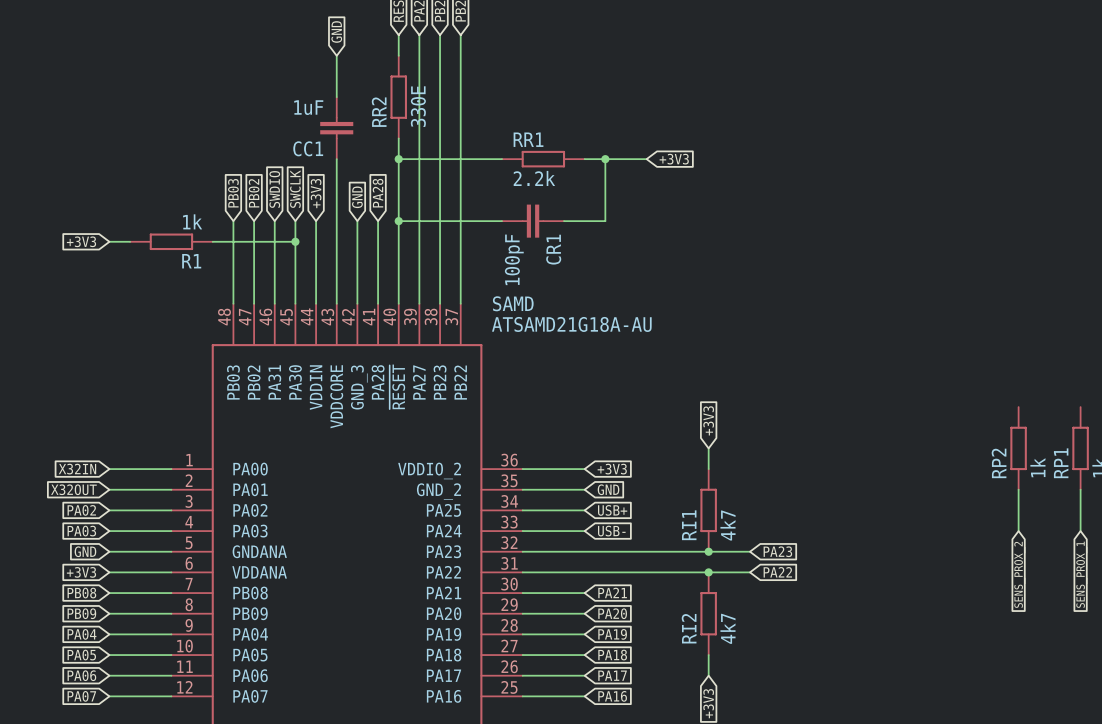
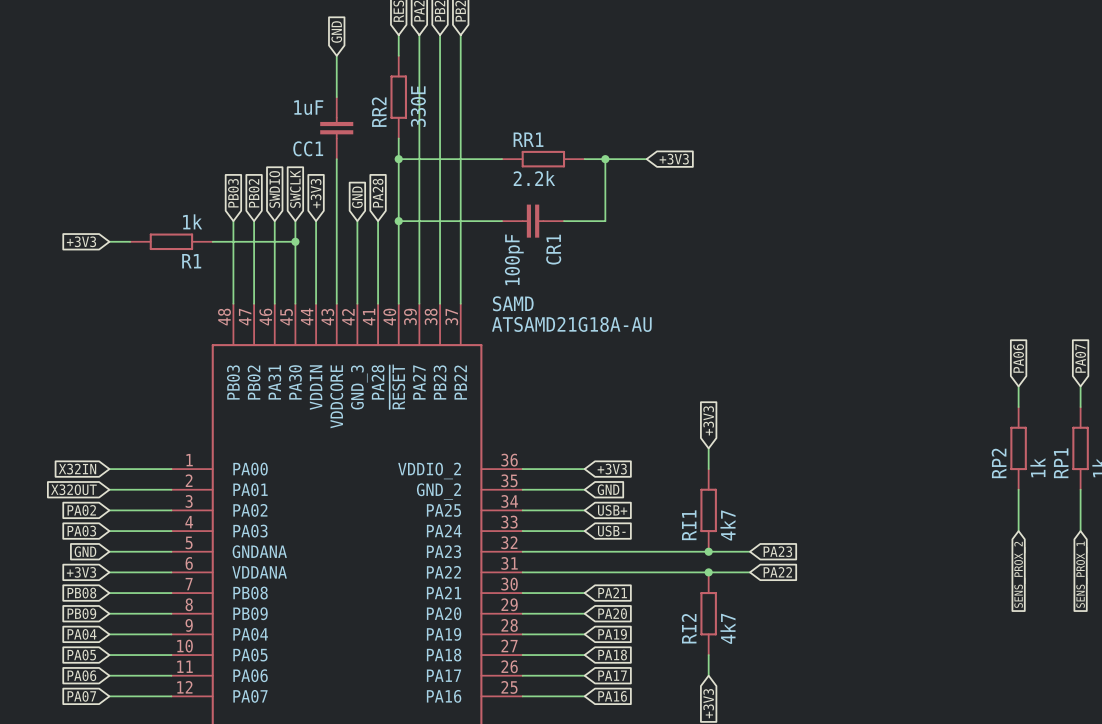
global label: none -> PA06 (1018, 358)
global label: none -> PA07 (1080, 358)
wire: none -> (1018, 386) (1018, 407)
wire: none -> (1080, 386) (1080, 407)

